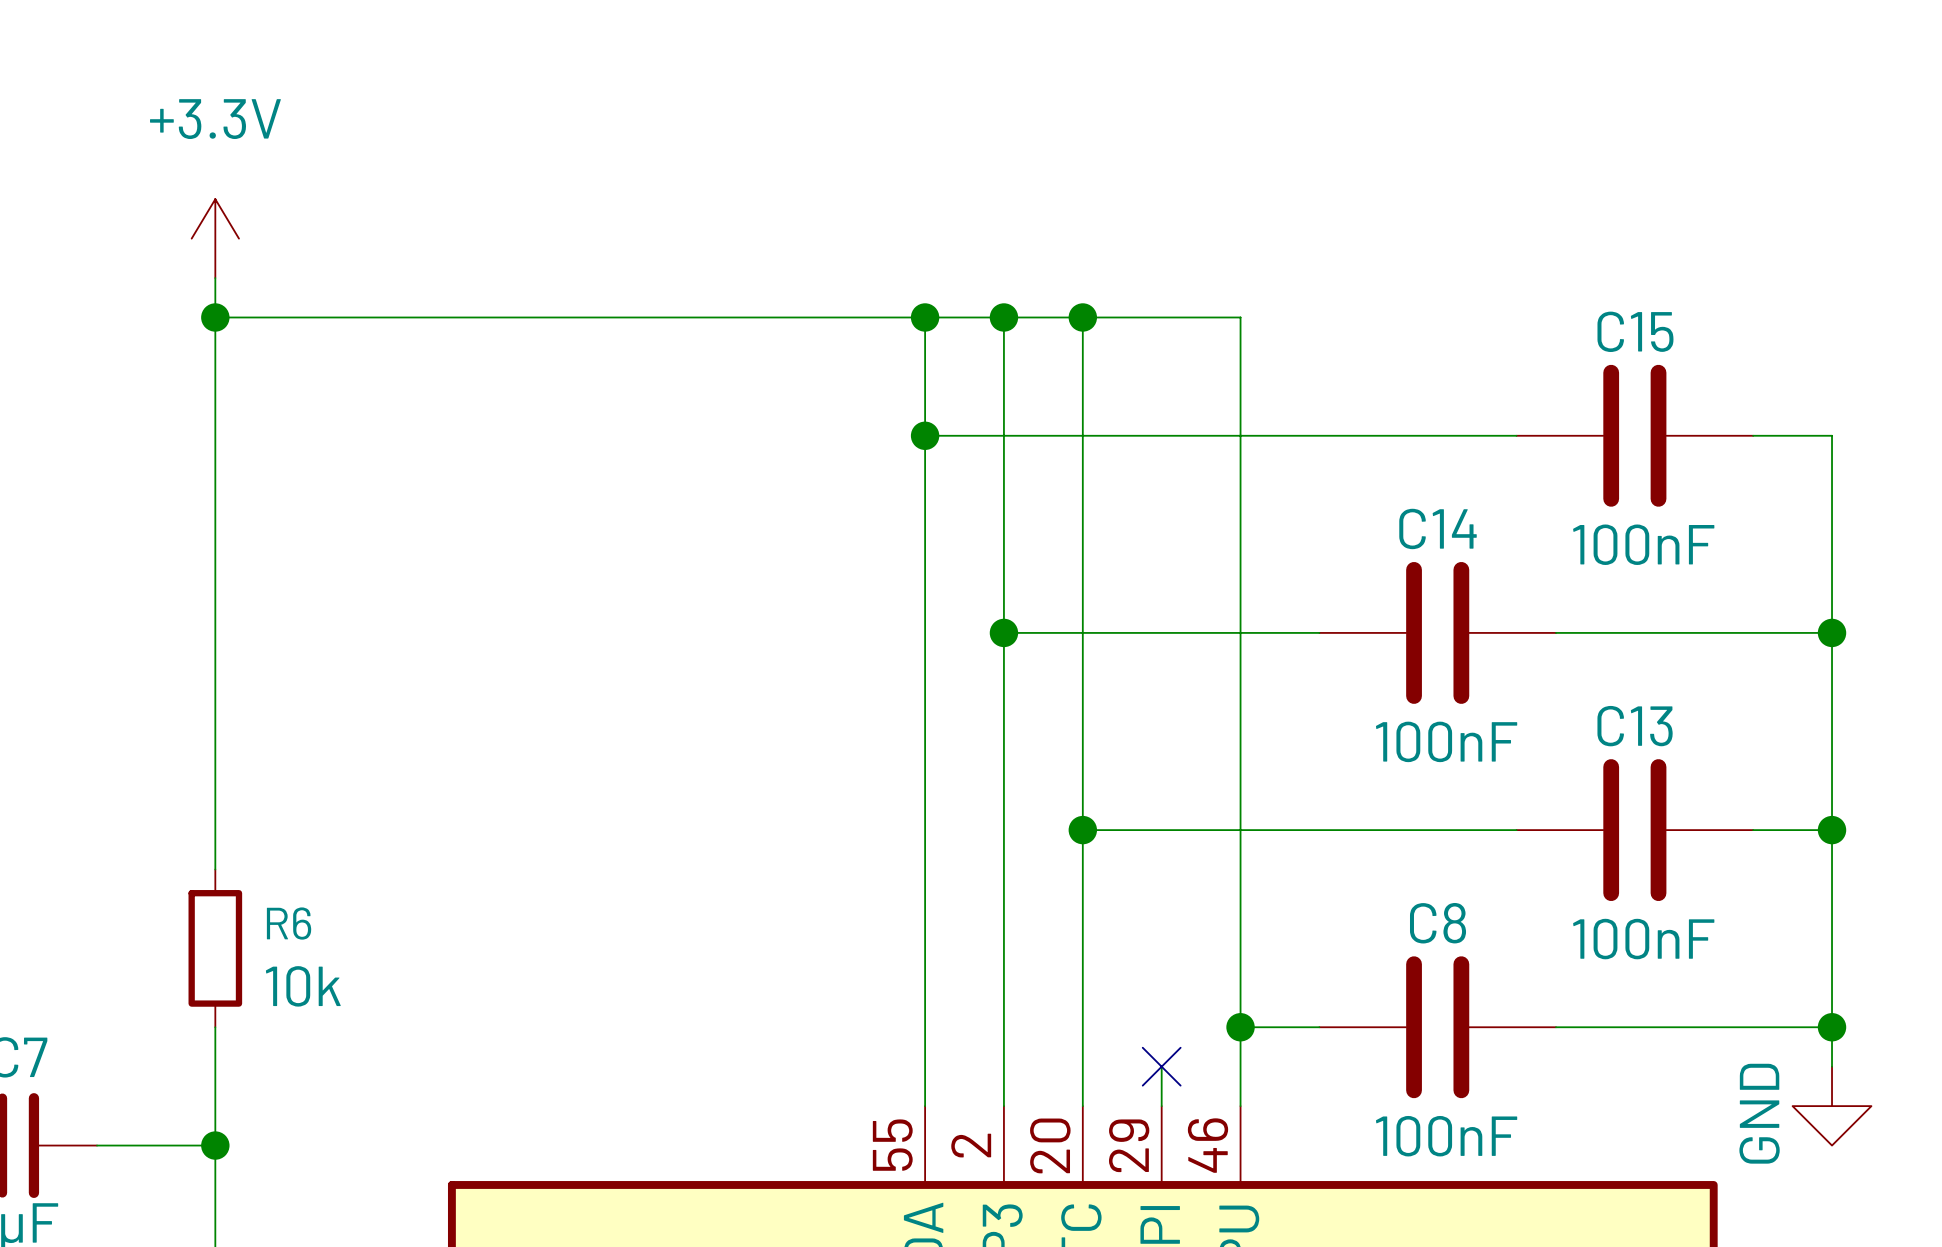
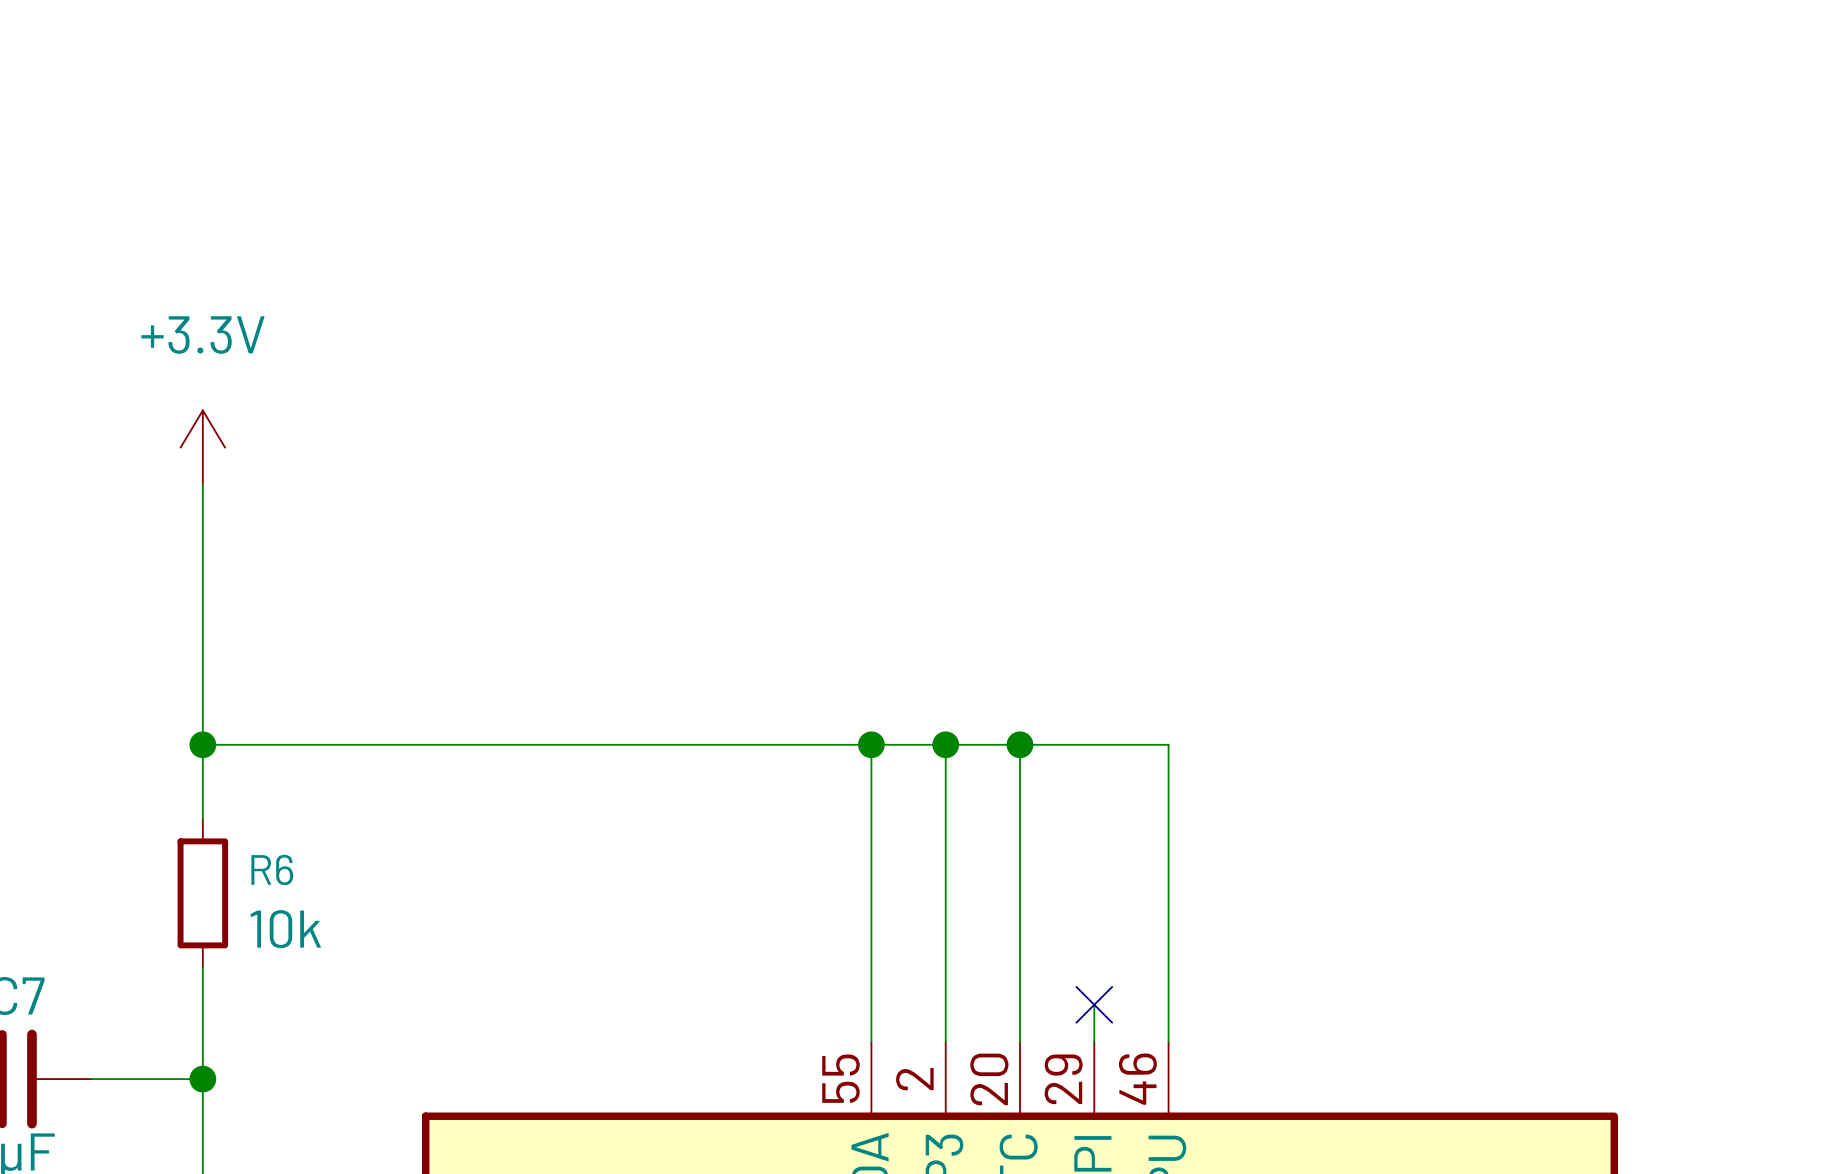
power symbol position: +3.3V (215, 238) -> +3.3V (202, 447)
wire: (215, 278) (215, 514) -> none
wire: (215, 317) (1240, 317) (1240, 790) -> (202, 744) (1168, 744)
junction: (215, 317) -> none
wire: (925, 317) (925, 790) -> none
junction: (925, 317) -> none
wire: (1003, 317) (1003, 790) -> none
junction: (1003, 317) -> none
wire: (1082, 317) (1082, 790) -> none
junction: (1082, 317) -> none
wire: (925, 435) (1516, 435) -> none
junction: (925, 435) -> none
C15: 100nF (1634, 435) -> none
wire: (1753, 435) (1832, 435) (1832, 1066) -> none
wire: (1003, 632) (1319, 632) -> none
junction: (1003, 632) -> none
C14: 100nF (1437, 632) -> none
wire: (1555, 632) (1832, 632) -> none
junction: (1832, 632) -> none
junction: none -> (202, 744)
junction: none -> (871, 744)
junction: none -> (945, 744)
wire: (1082, 830) (1516, 830) -> none
junction position: (1082, 830) -> (1020, 744)
C13: 100nF (1634, 830) -> none
wire: (1753, 830) (1832, 830) -> none
junction: (1832, 830) -> none
wire: (1240, 1027) (1319, 1027) -> none
junction: (1240, 1027) -> none
C8: 100nF (1437, 1027) -> none
wire: (1555, 1027) (1832, 1027) -> none
junction: (1832, 1027) -> none
power symbol: GND (1832, 1106) -> none

